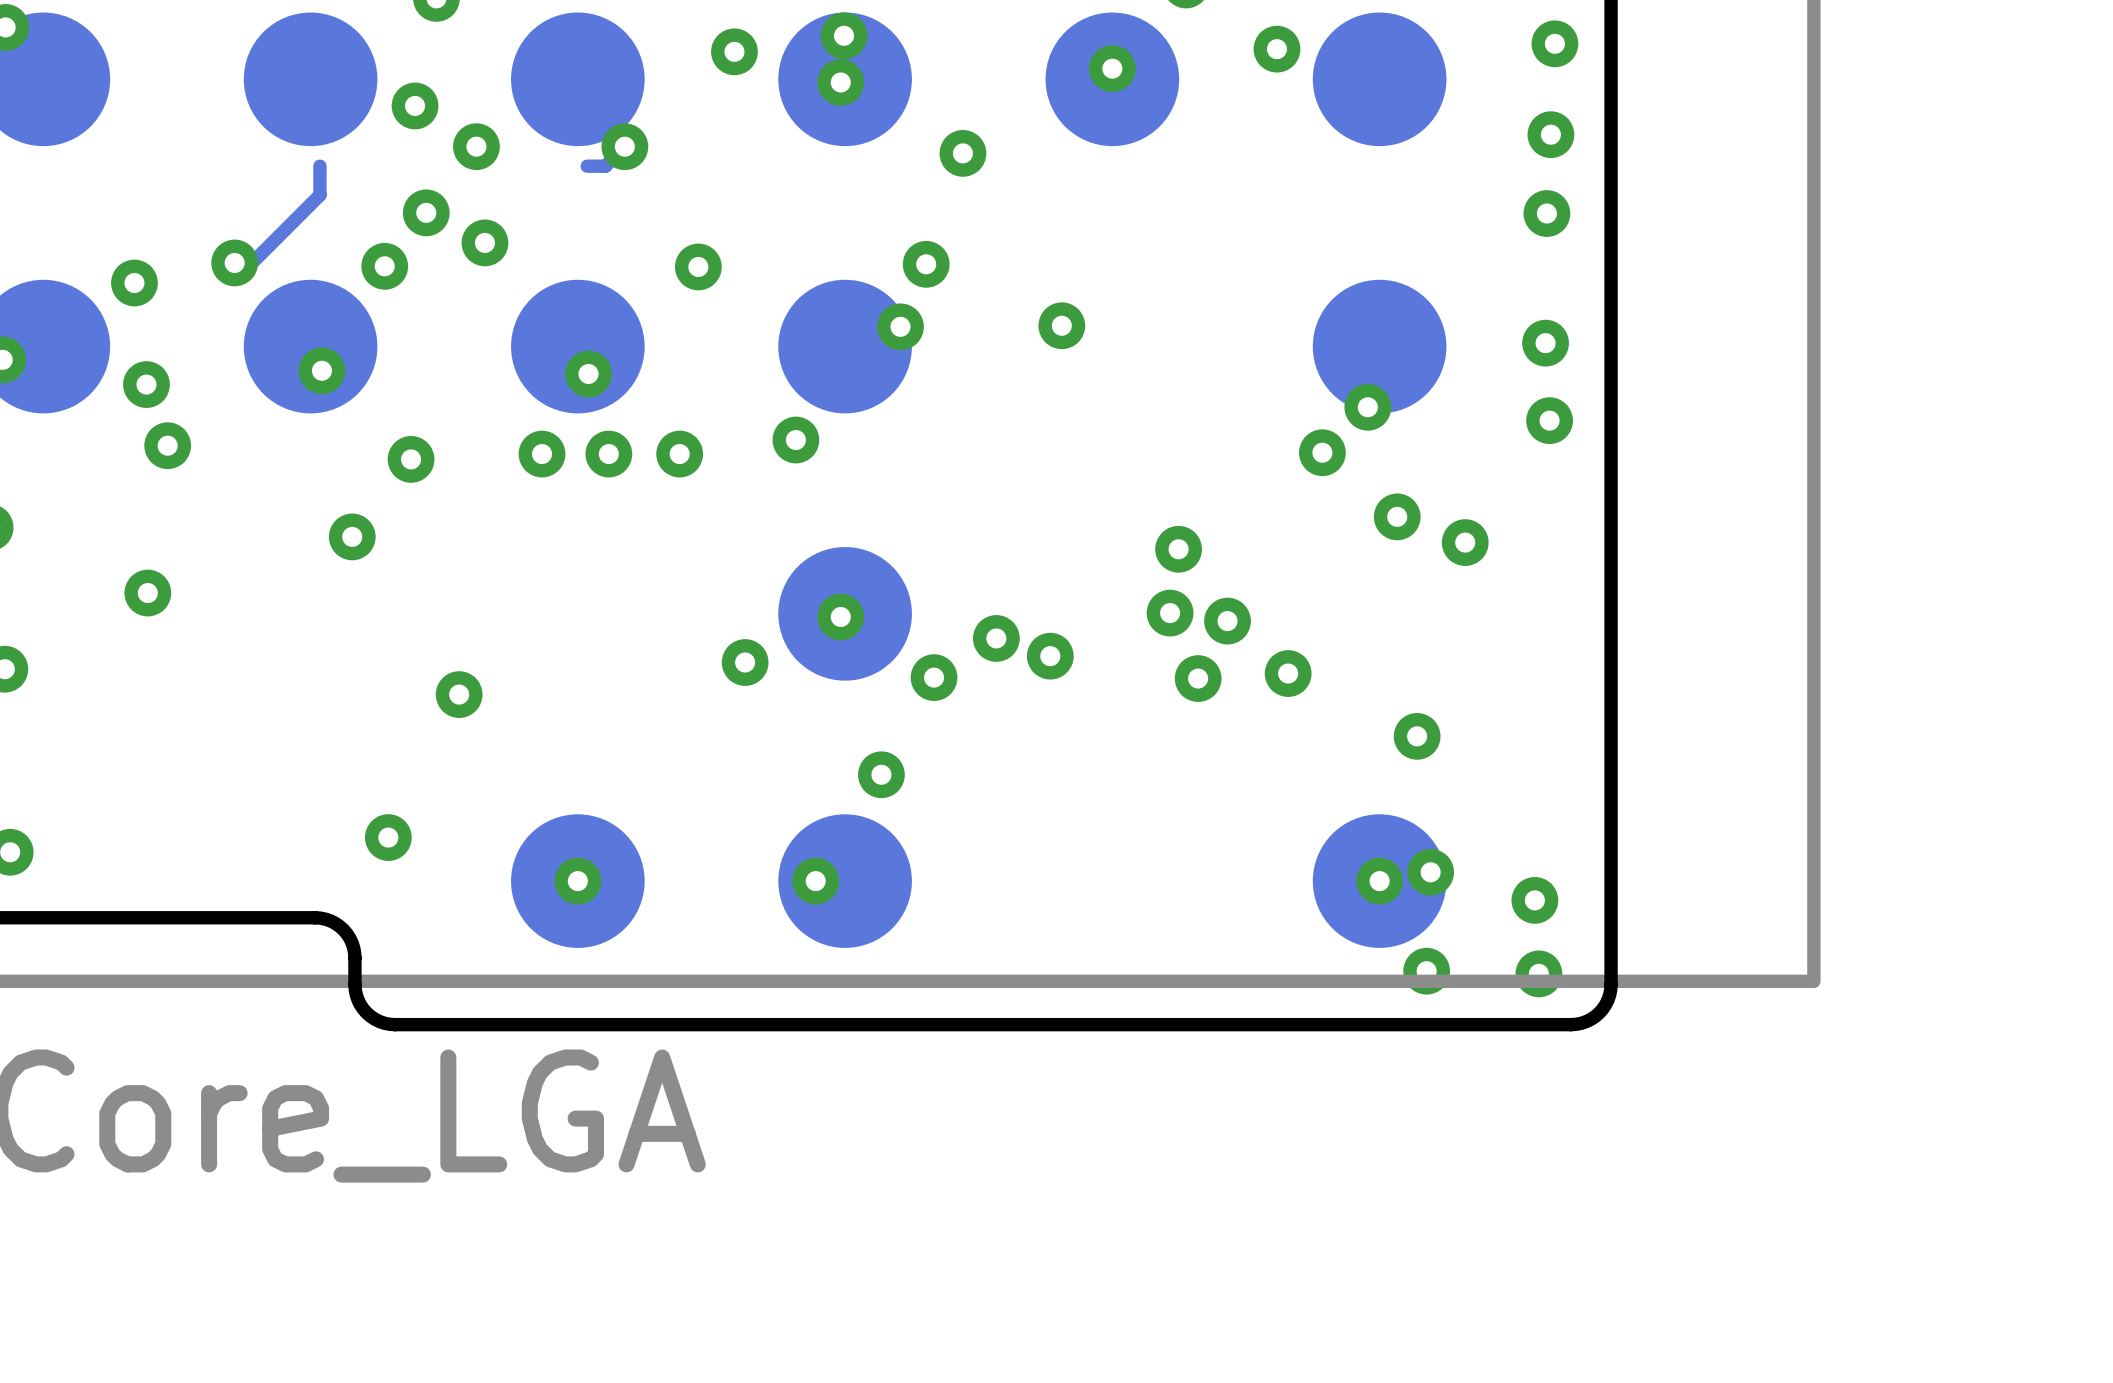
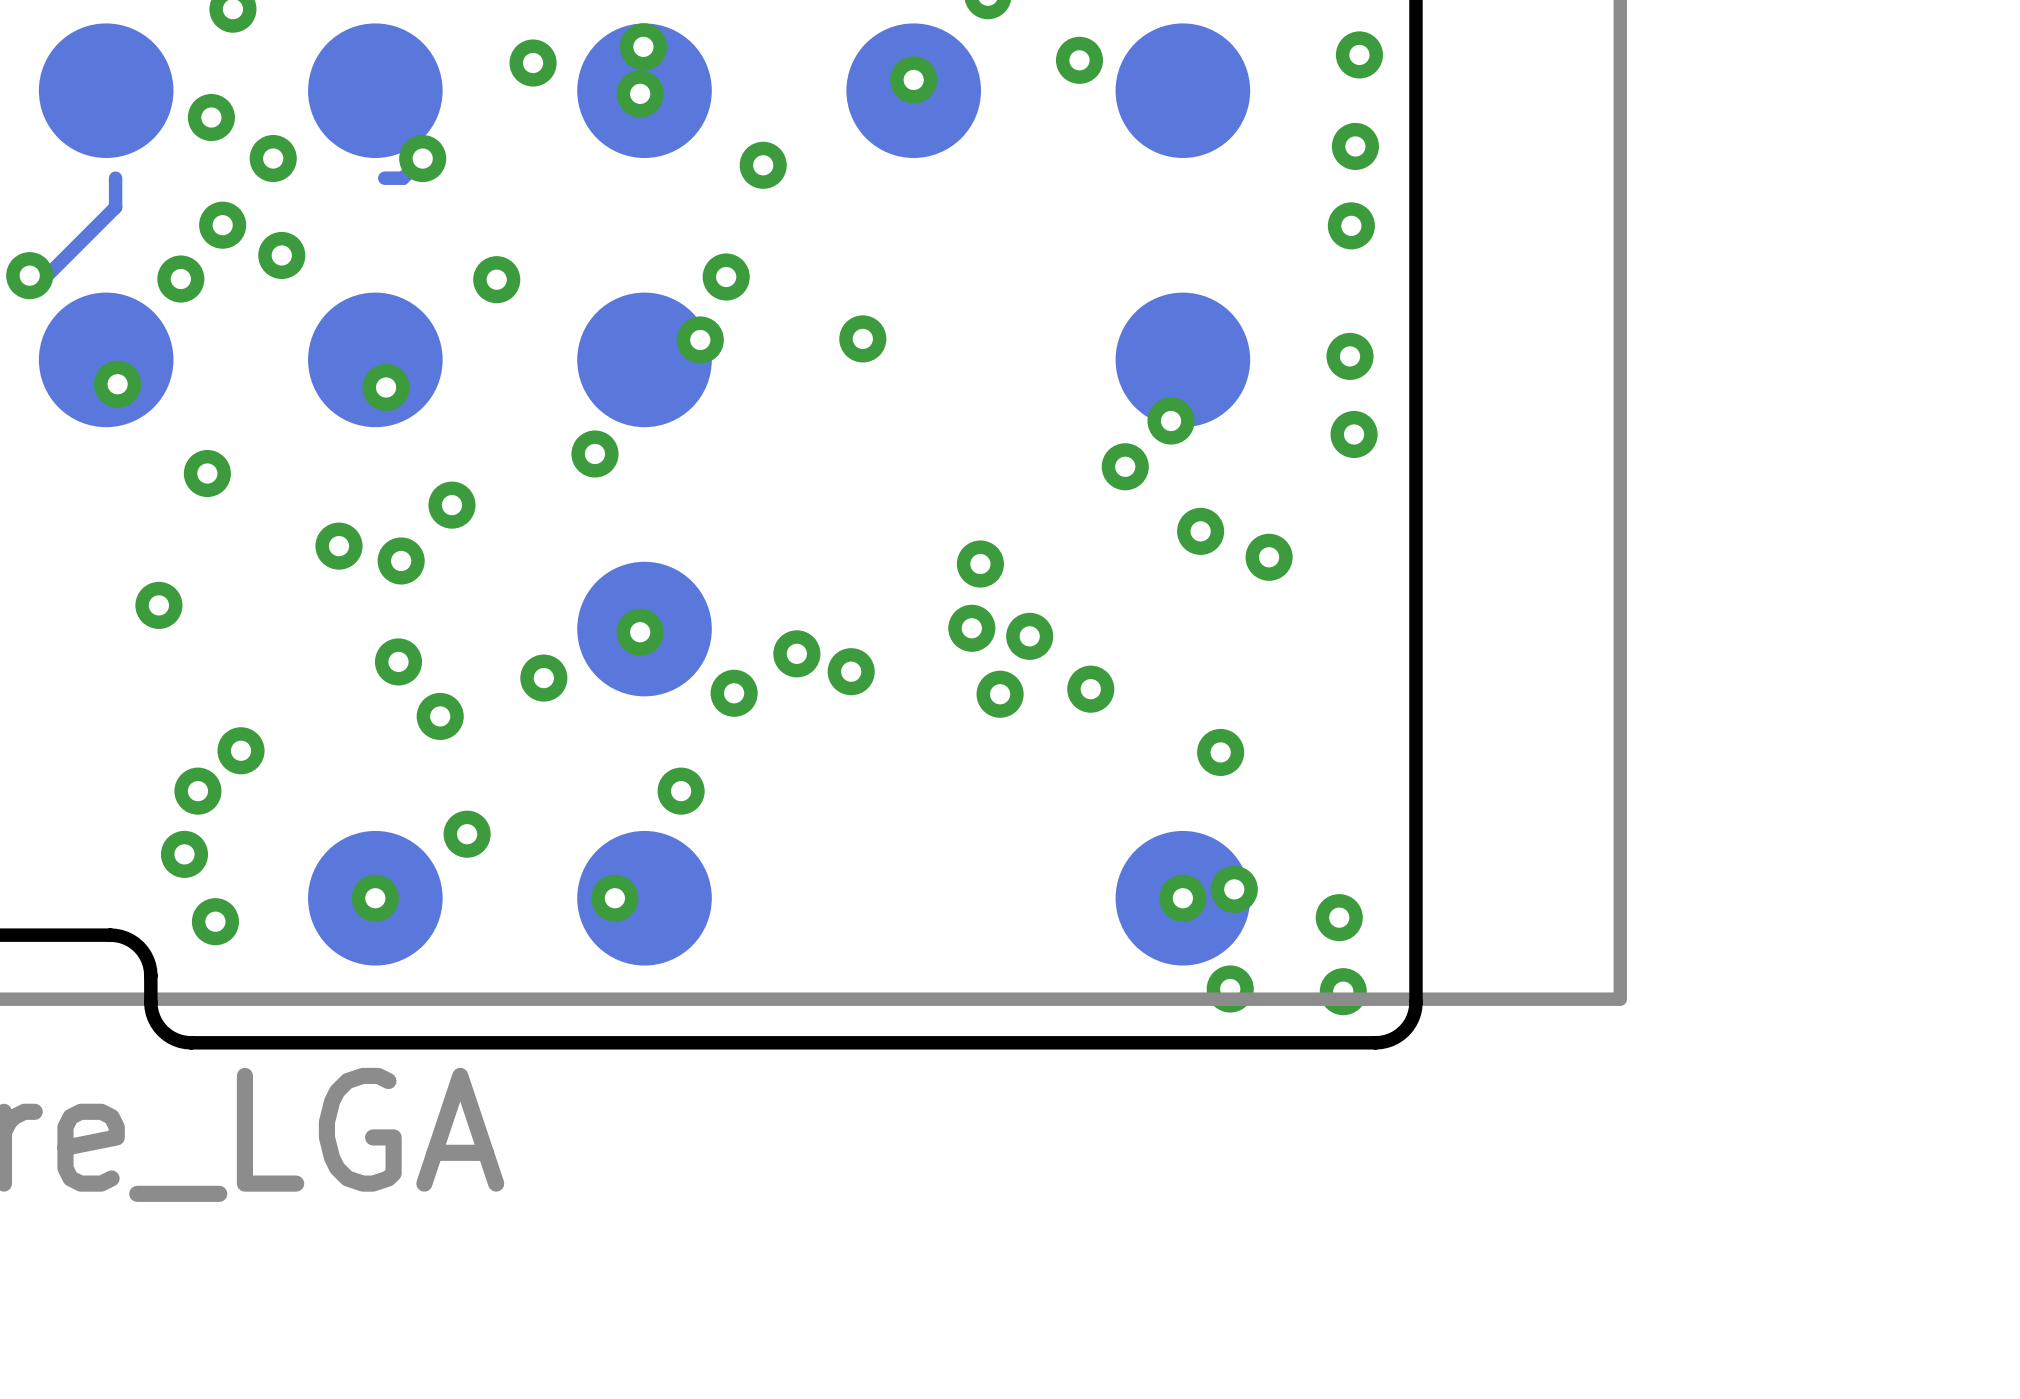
via: (542, 454) -> none
via: (608, 454) -> none
via: (679, 454) -> none
via: none -> (451, 505)
via: none -> (338, 546)
via position: (352, 536) -> (158, 605)
via: none -> (401, 560)
via: none -> (398, 661)
via position: (459, 694) -> (241, 750)
via: none -> (440, 716)
via: none -> (197, 791)
via: none -> (467, 834)
via: none -> (215, 921)

